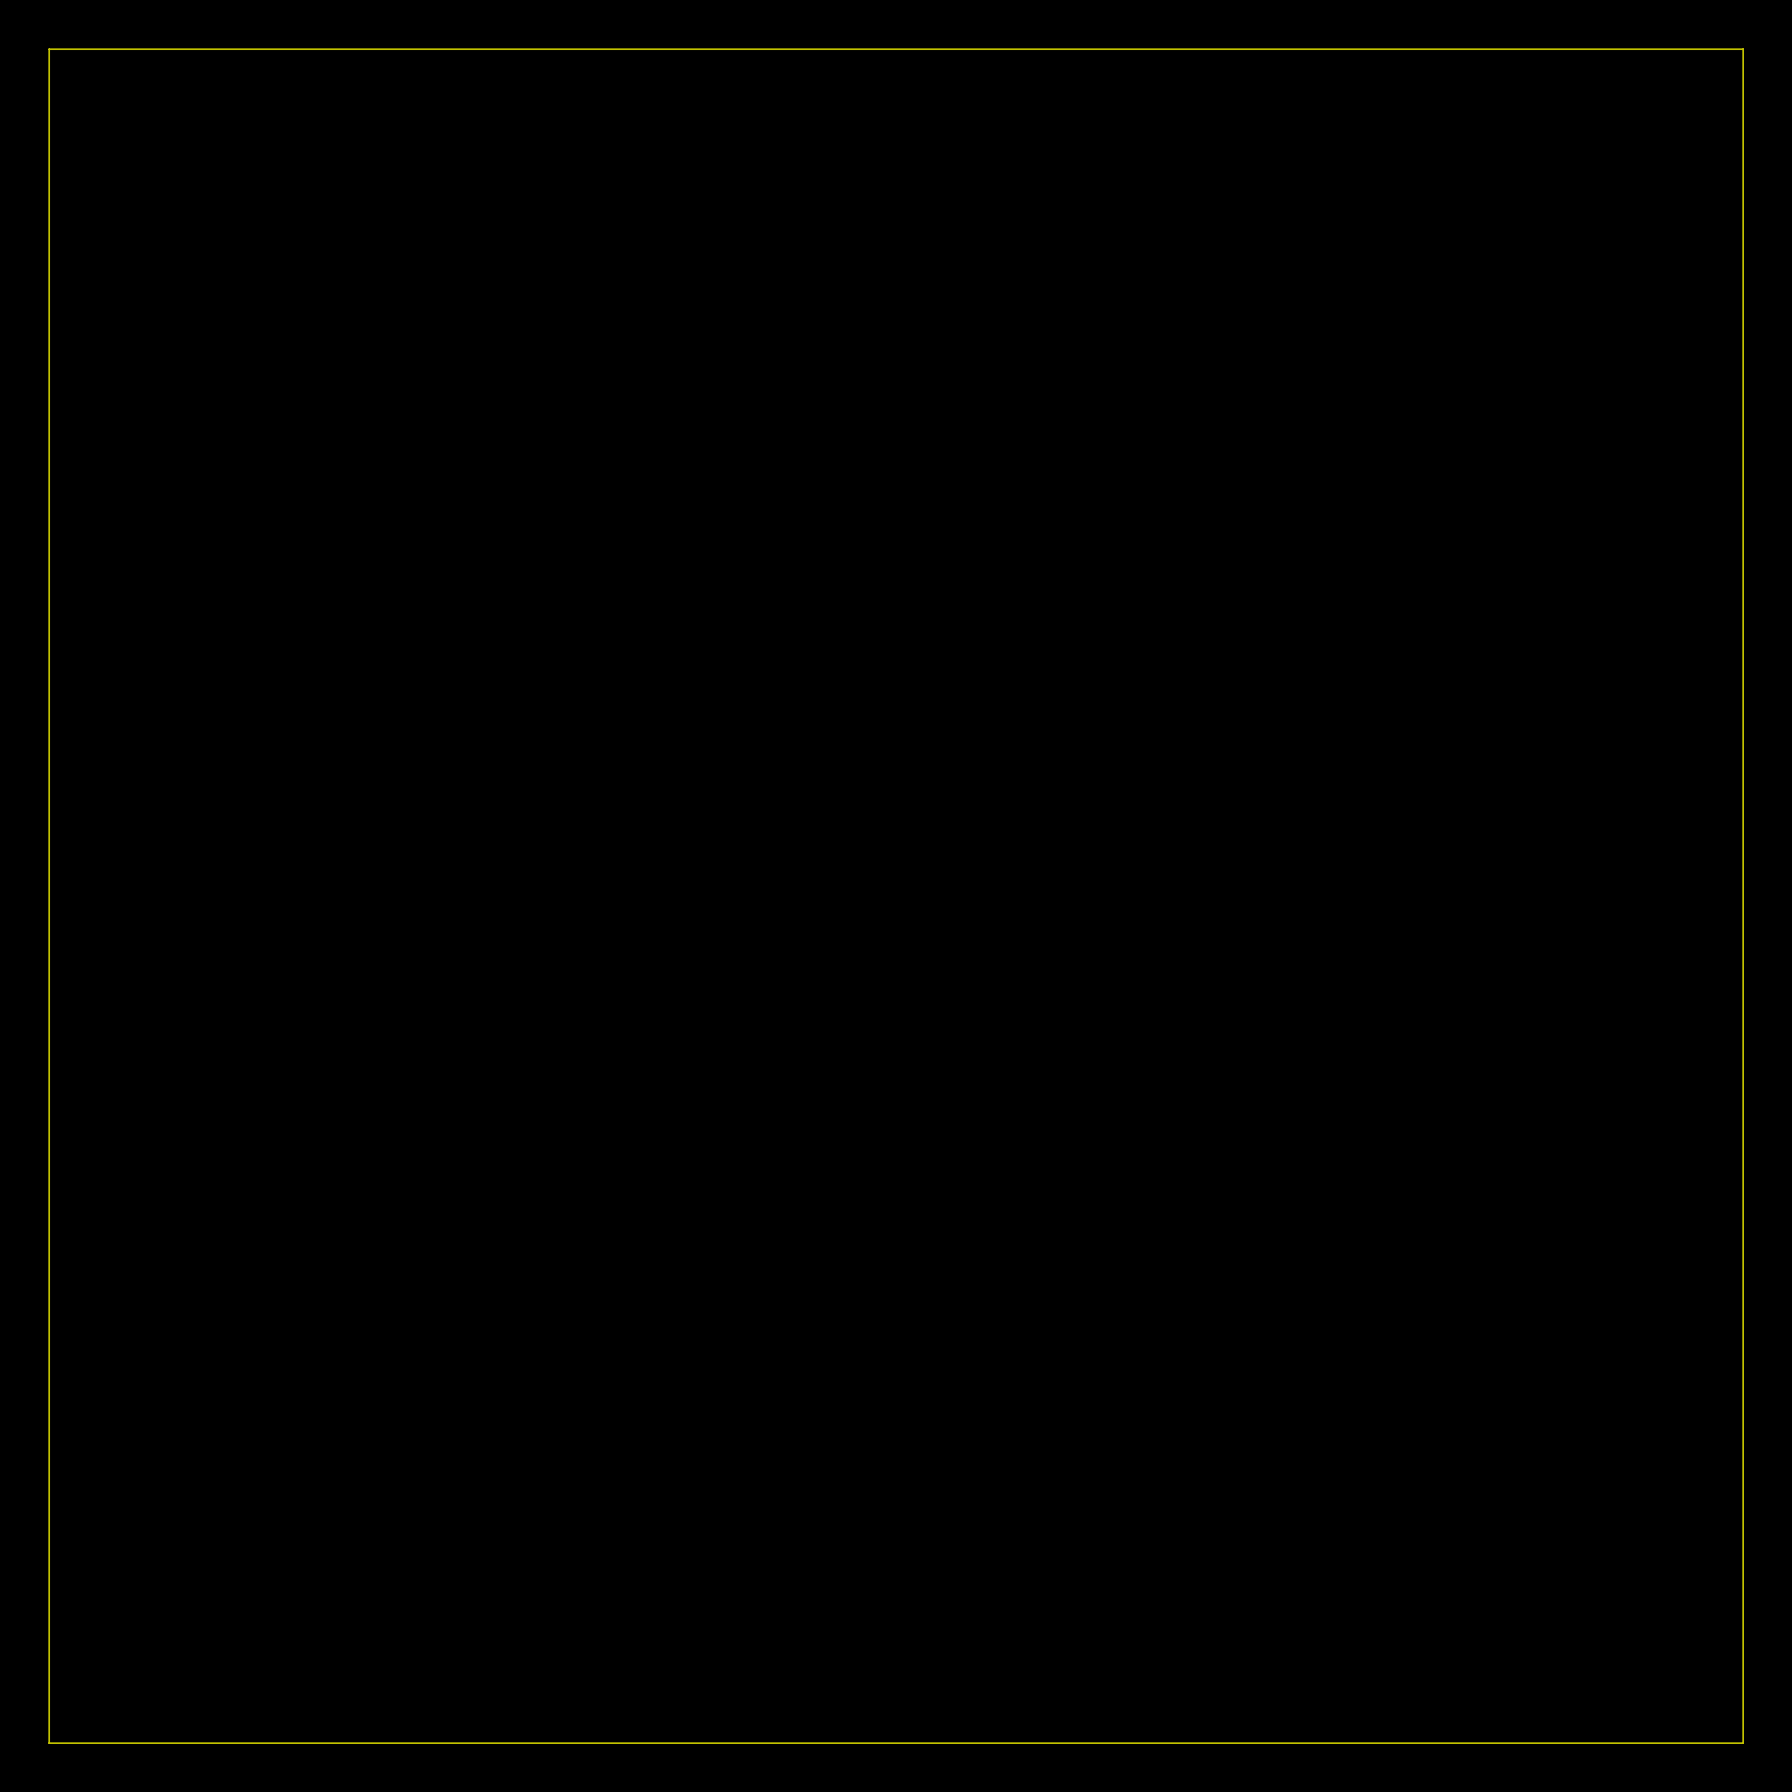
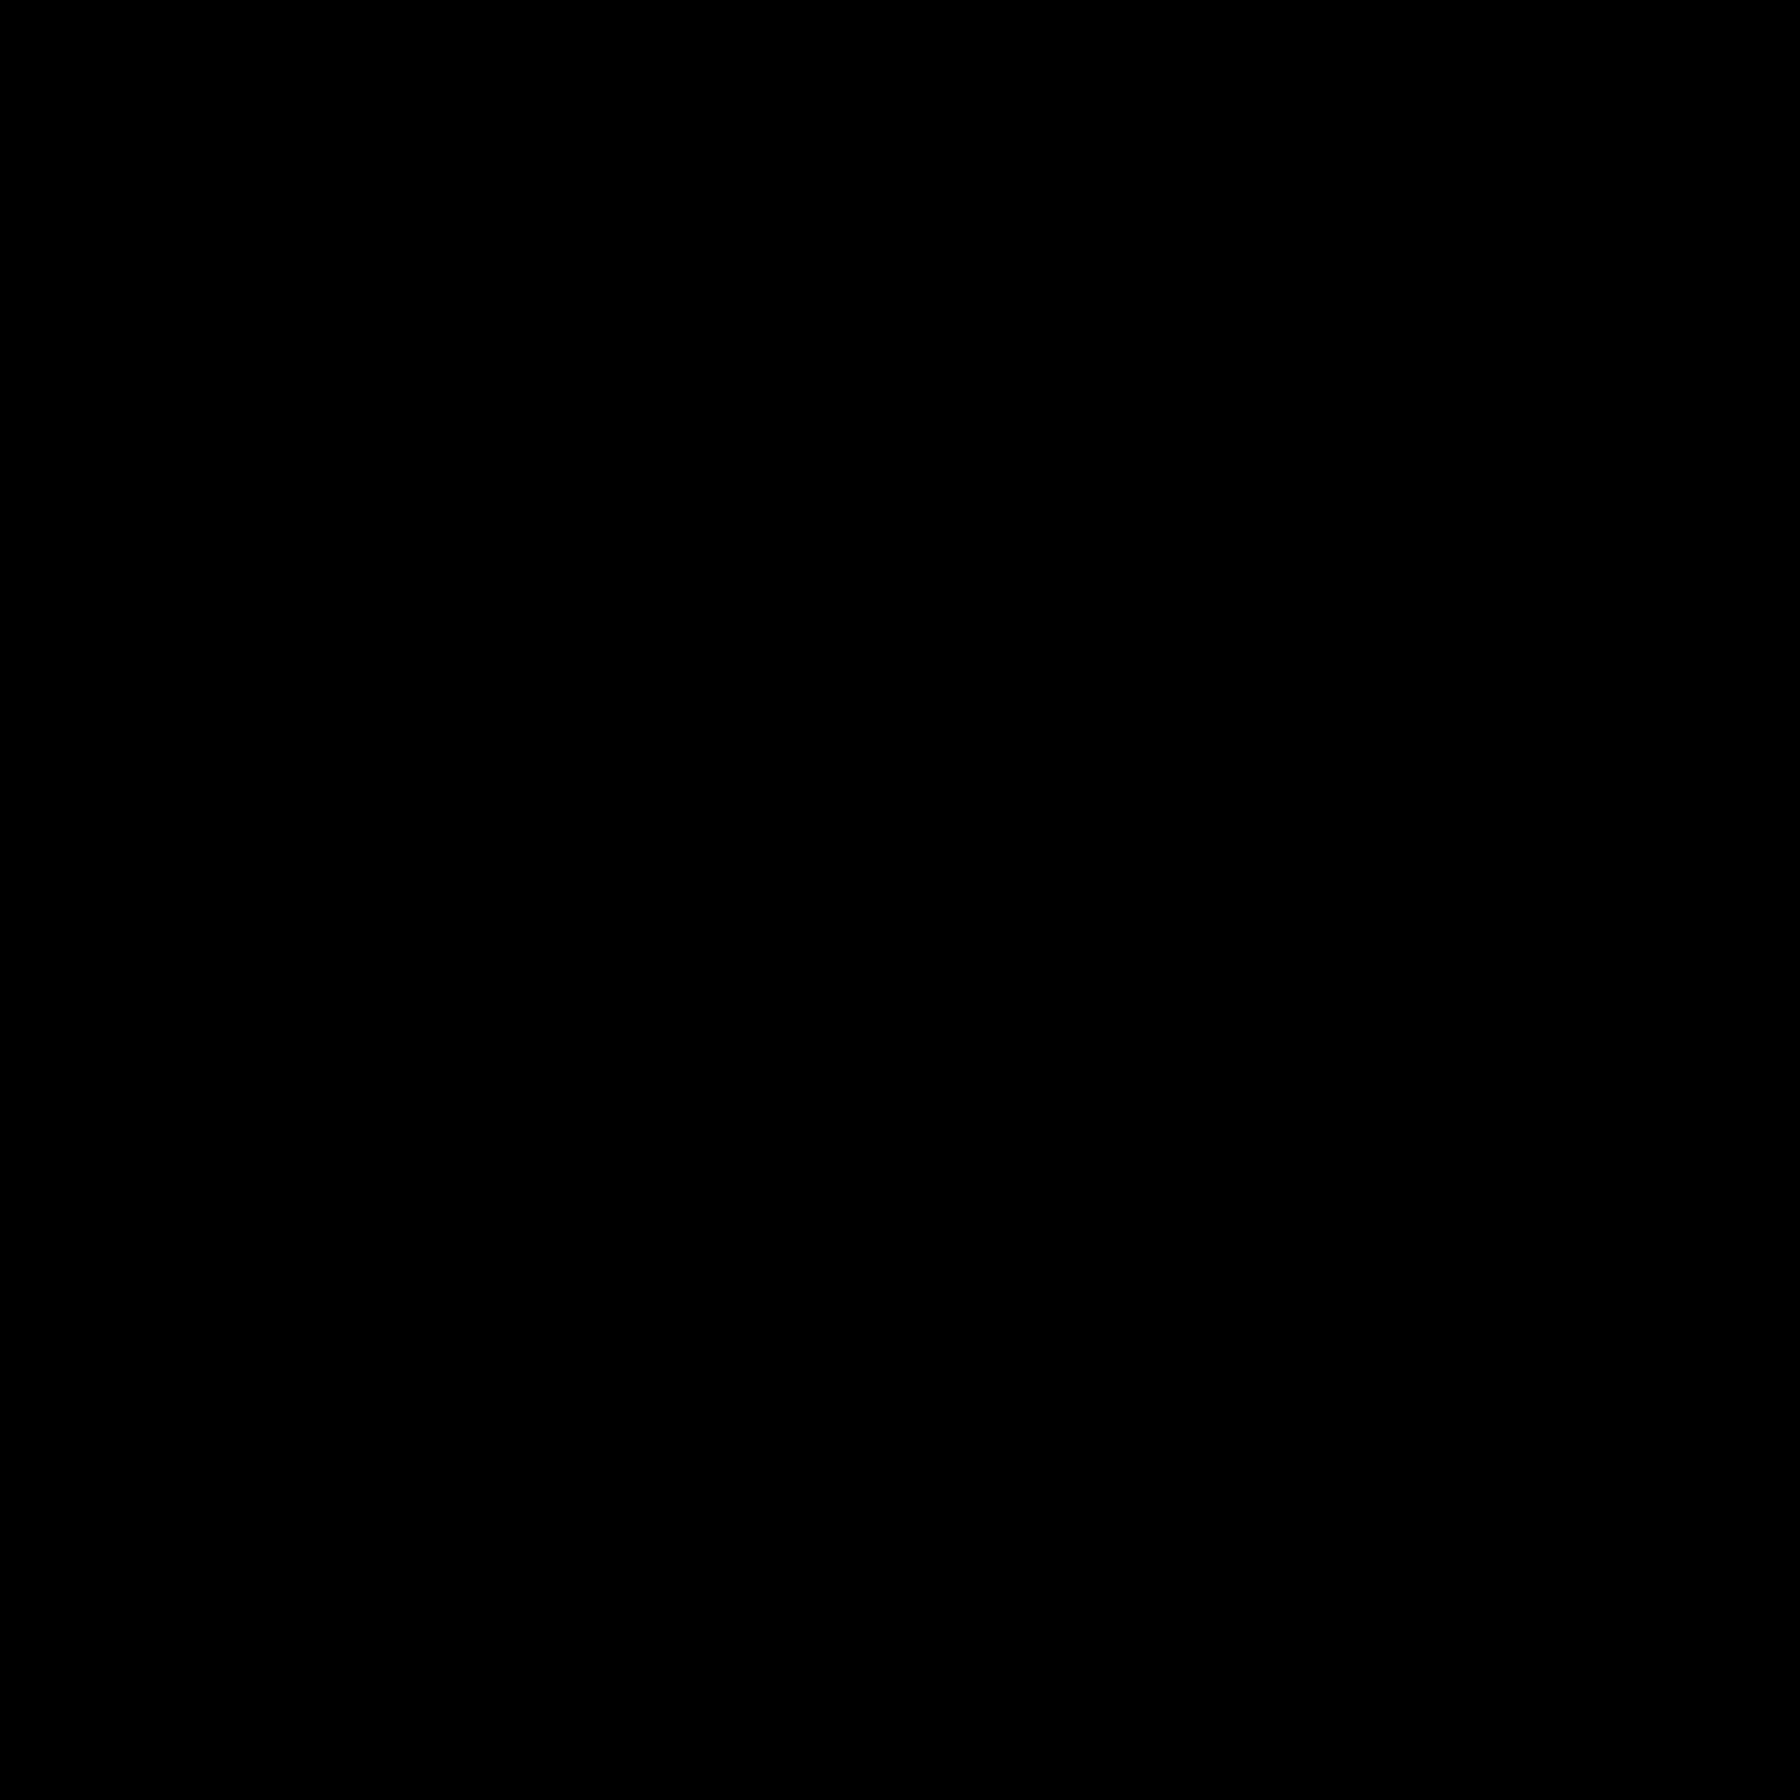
board edge: (1743, 49) (49, 49) (49, 1743) (1743, 1743) (1743, 49) -> none

